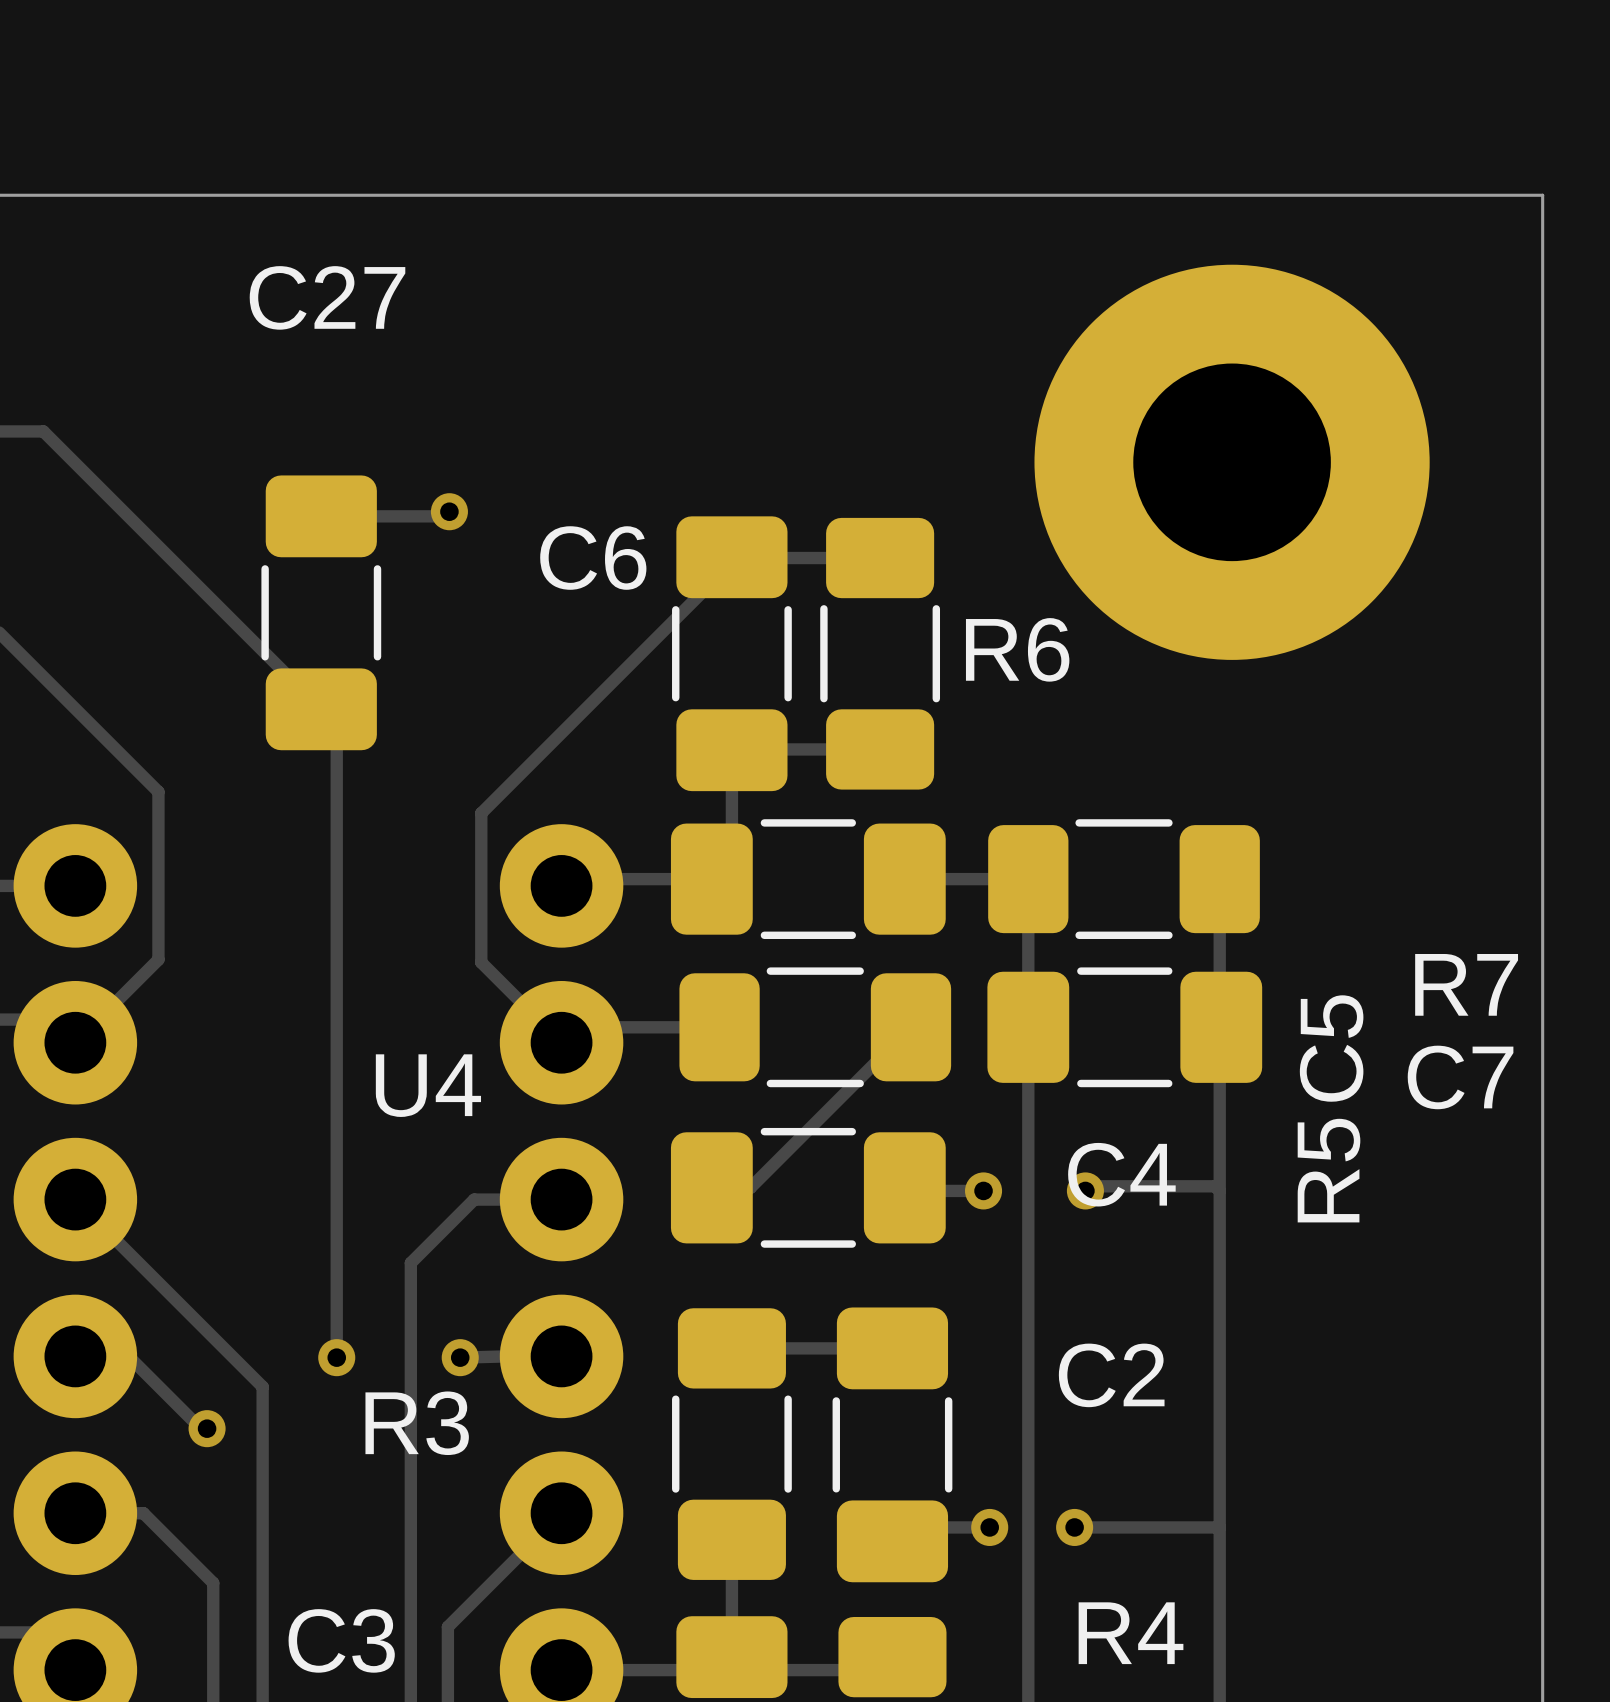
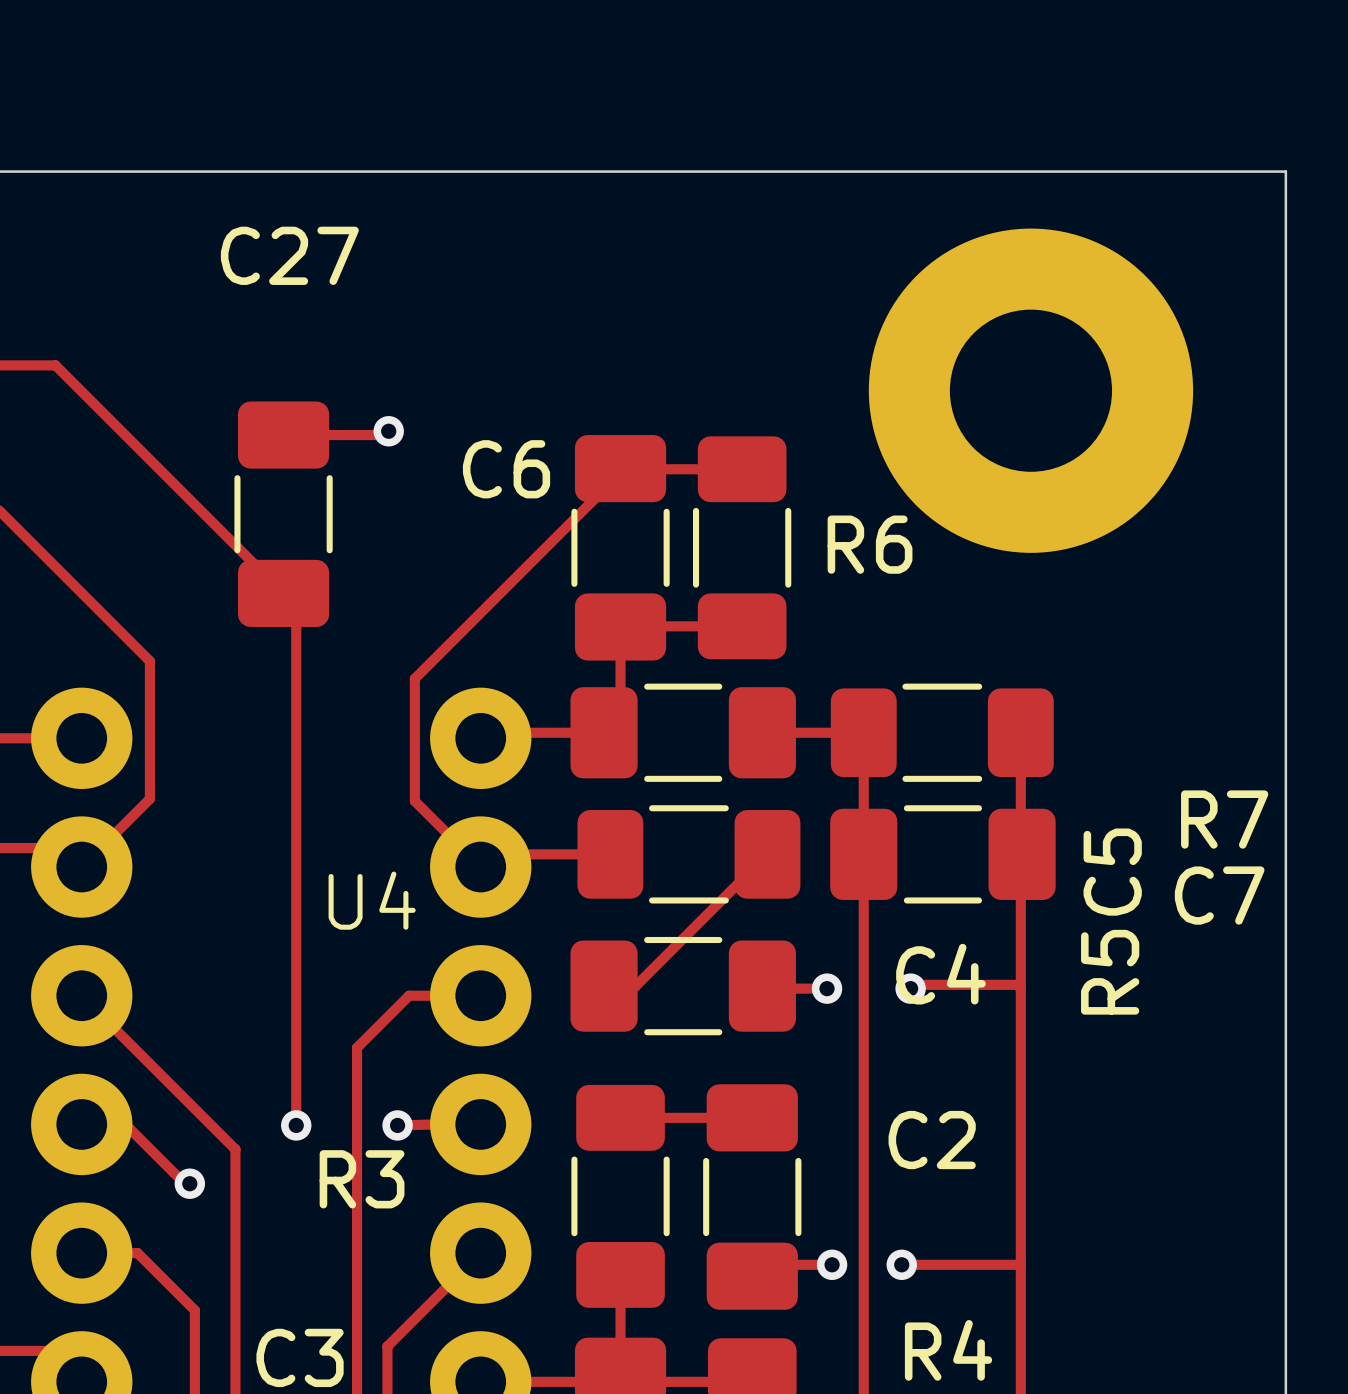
R6 name position: R6 (1017, 649) -> R6 (870, 544)

